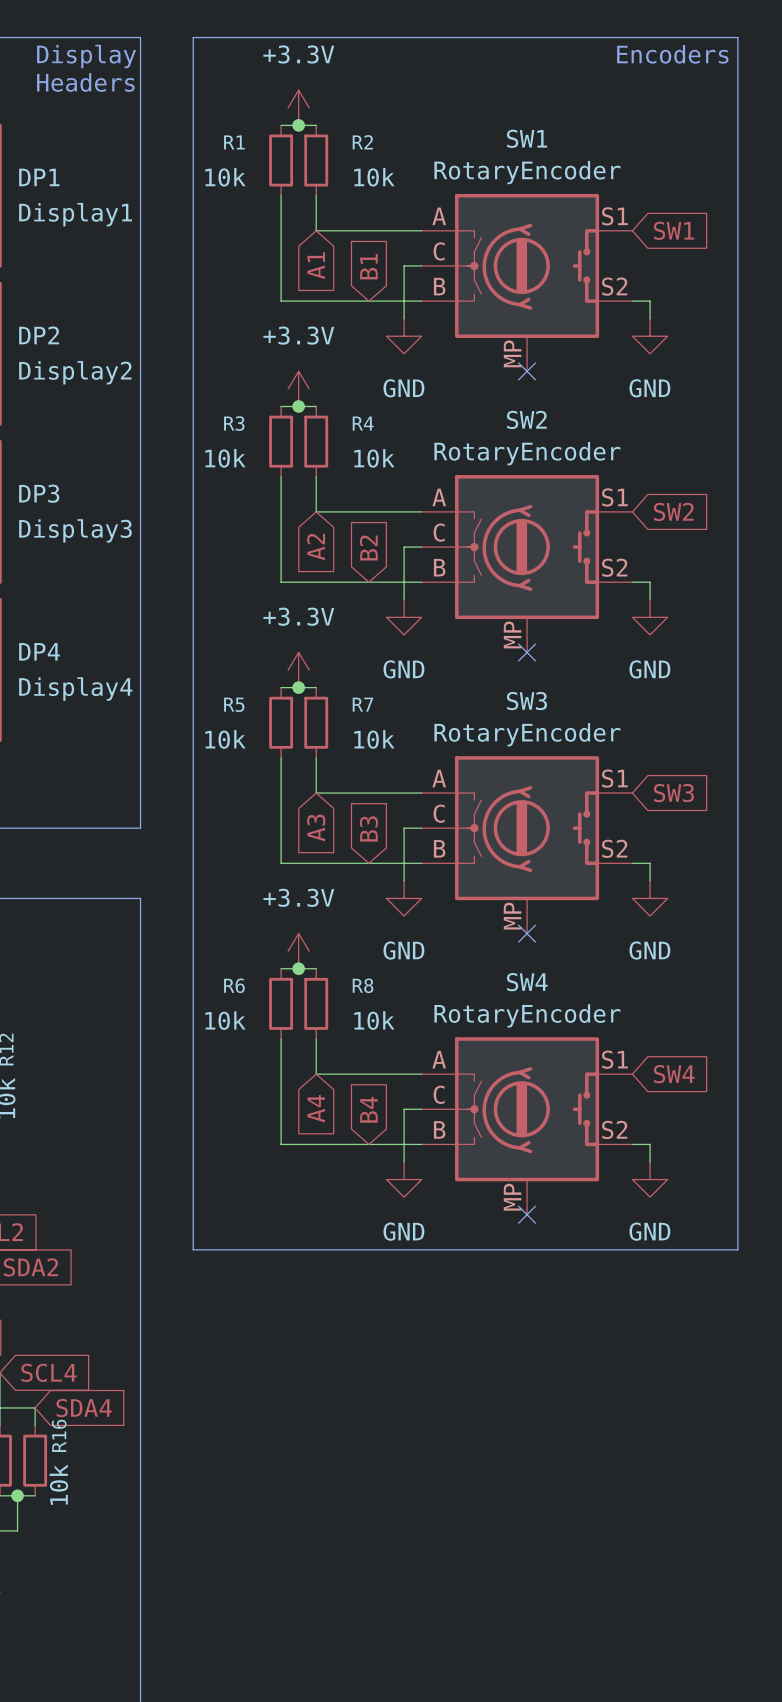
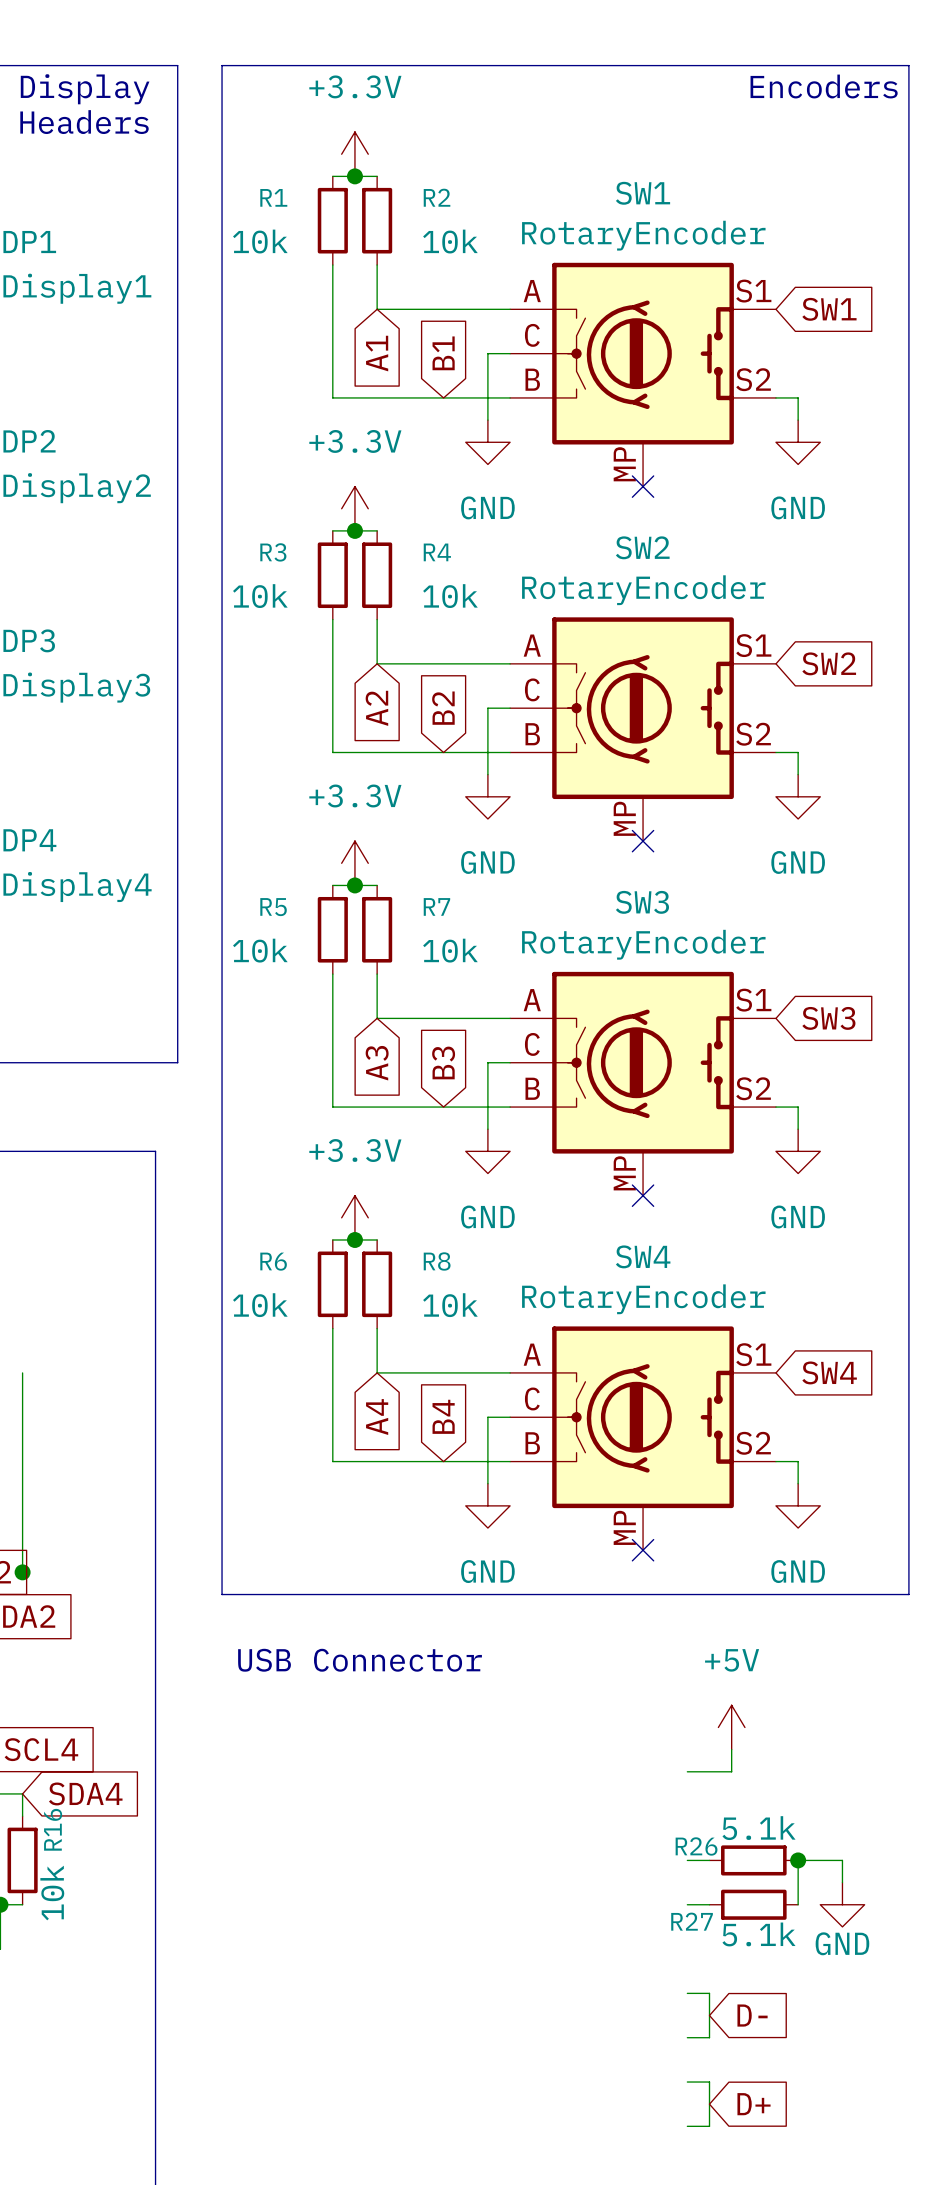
line: (140, 37) (140, 828) -> (155, 65) (177, 65) (177, 1062) (155, 1062)
wire: none -> (22, 1372) (22, 1572)
junction: none -> (22, 1572)
text: none -> USB Connector (360, 1660)
power symbol: none -> +5V (731, 1727)
wire: none -> (731, 1749) (731, 1771) (687, 1771)
wire: none -> (687, 1860) (709, 1860)
R26: none -> 5.1k (753, 1860)
junction: none -> (798, 1860)
wire: none -> (842, 1882) (842, 1860) (798, 1860) (798, 1904)
wire: none -> (687, 1904) (709, 1904)
R27: none -> 5.1k (753, 1904)
power symbol: none -> GND (842, 1904)
wire: none -> (687, 1993) (709, 1993) (709, 2037) (687, 2037)
global label: none -> D- (752, 2015)
wire: none -> (687, 2082) (709, 2082) (709, 2126) (687, 2126)
global label: none -> D+ (754, 2104)

